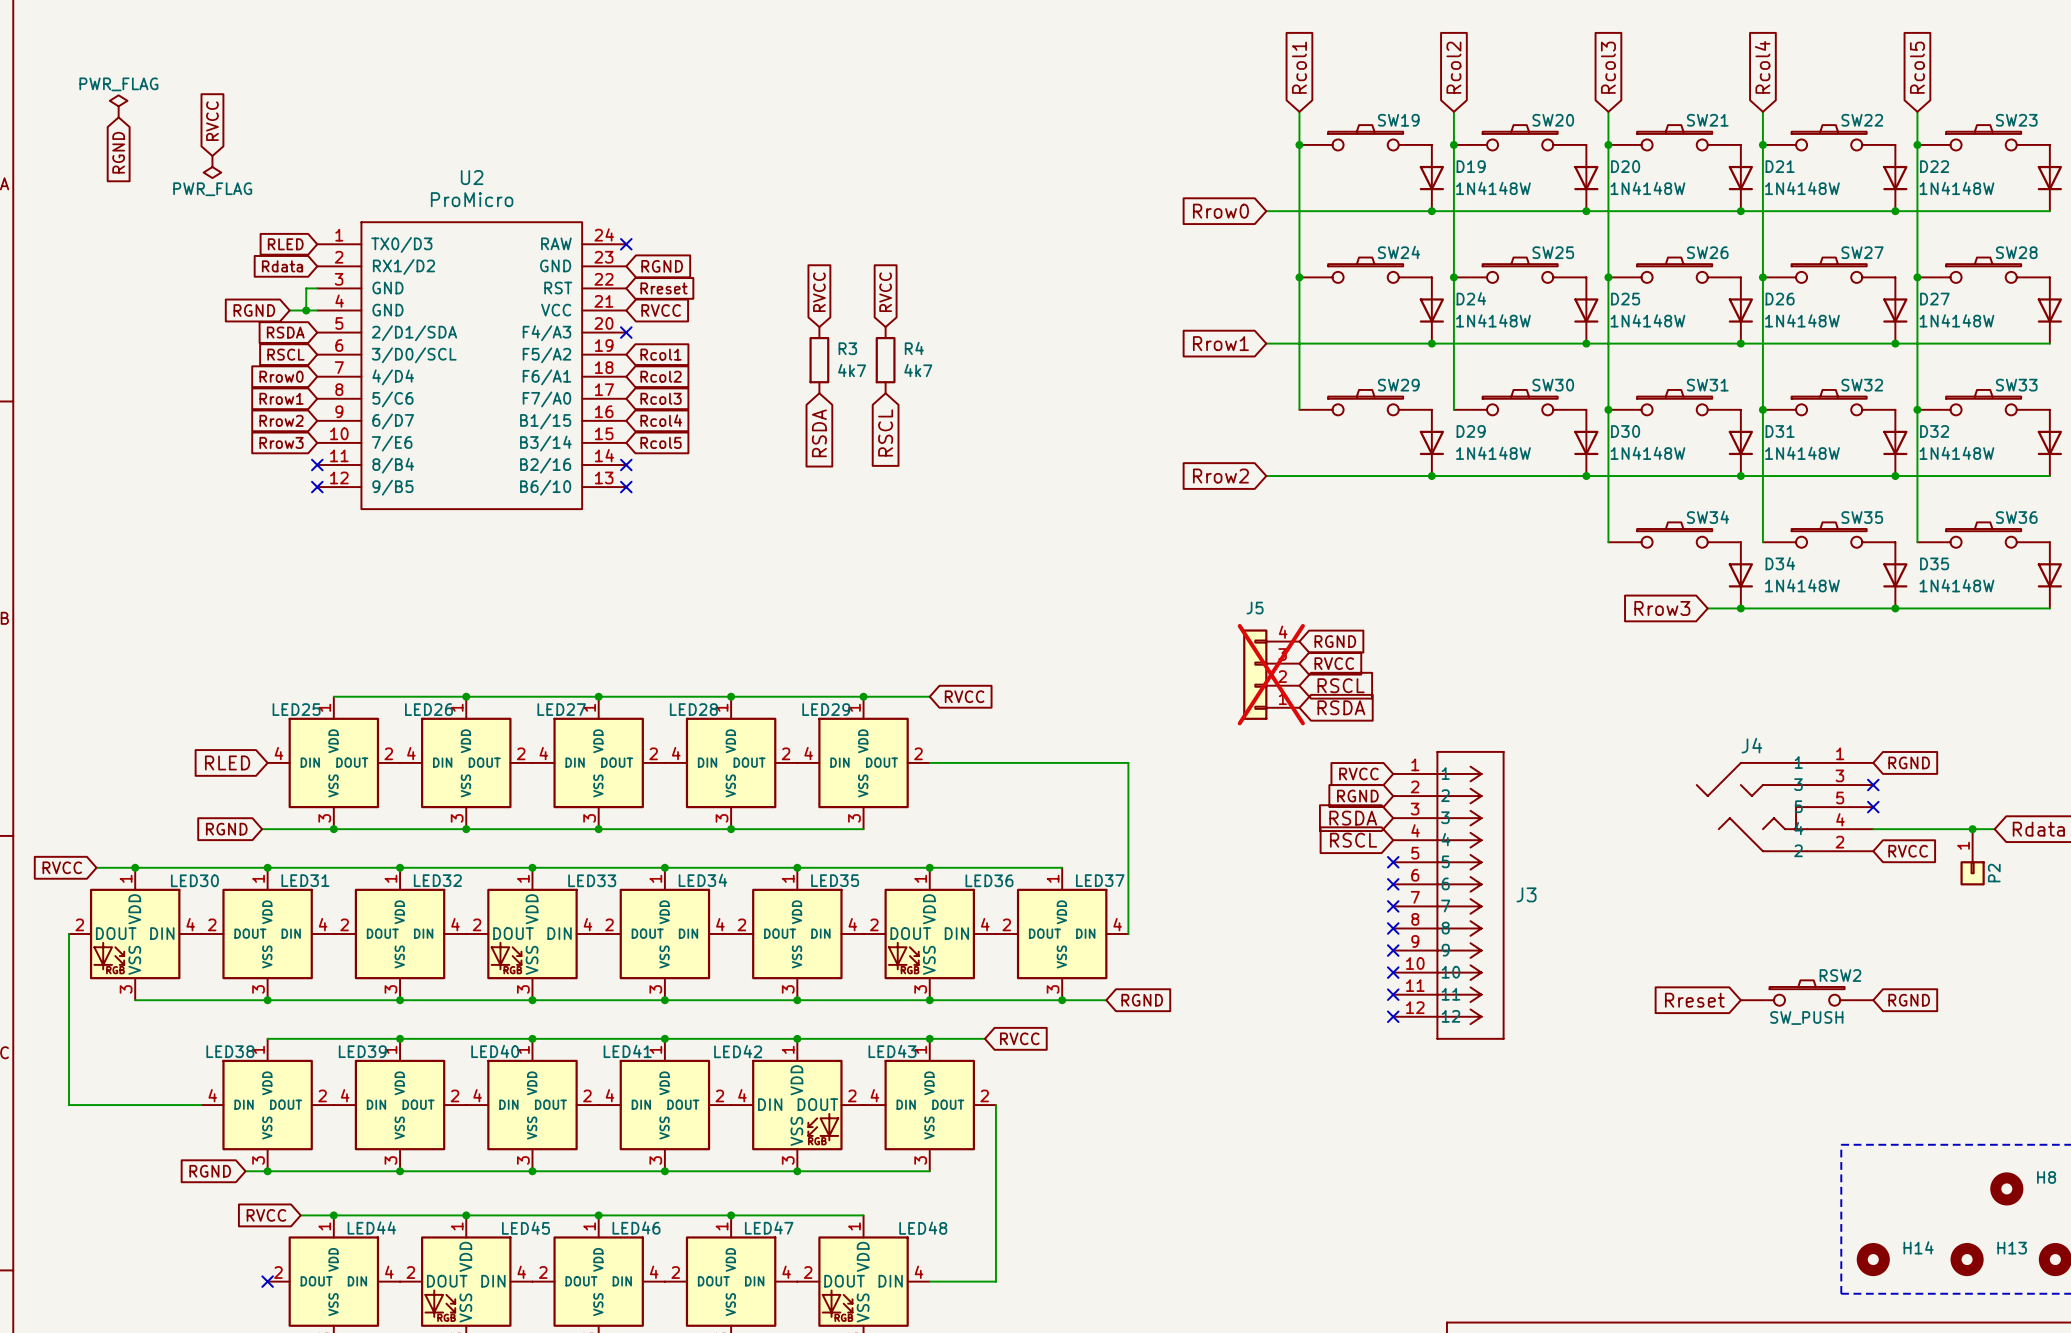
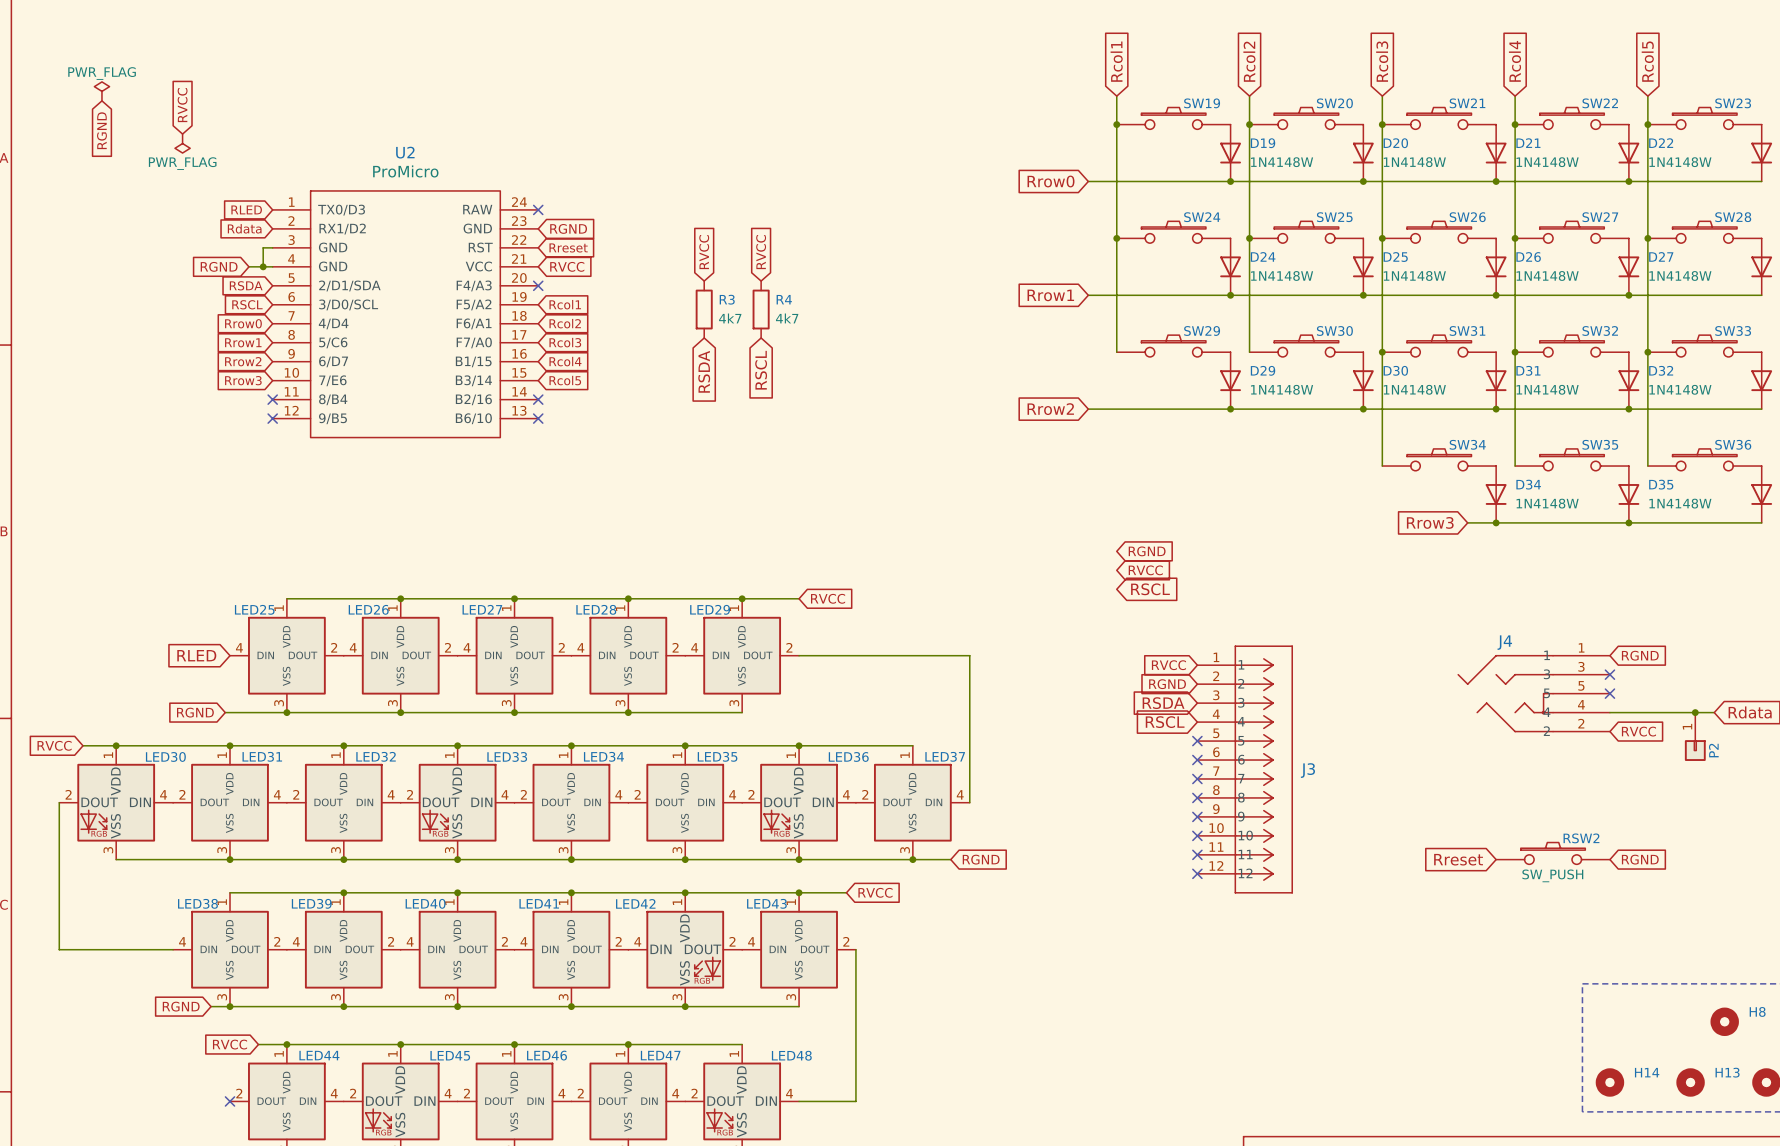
J5: (1271, 674) -> none
global label: RSDA (1341, 707) -> none

